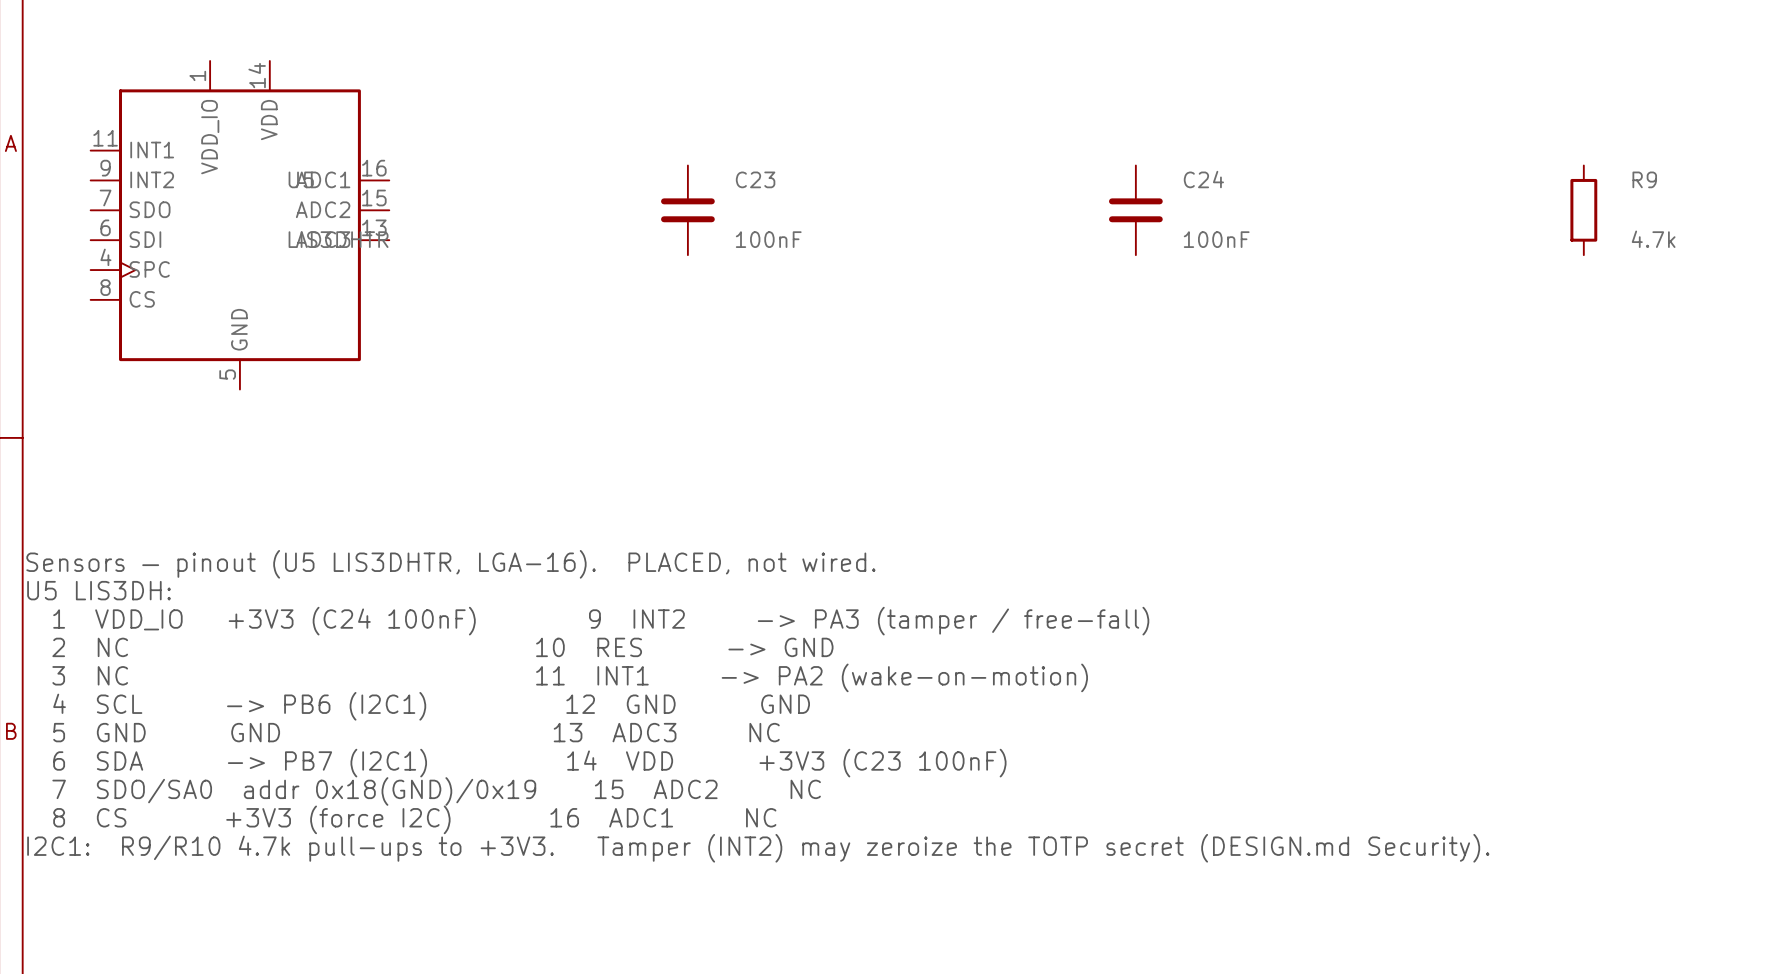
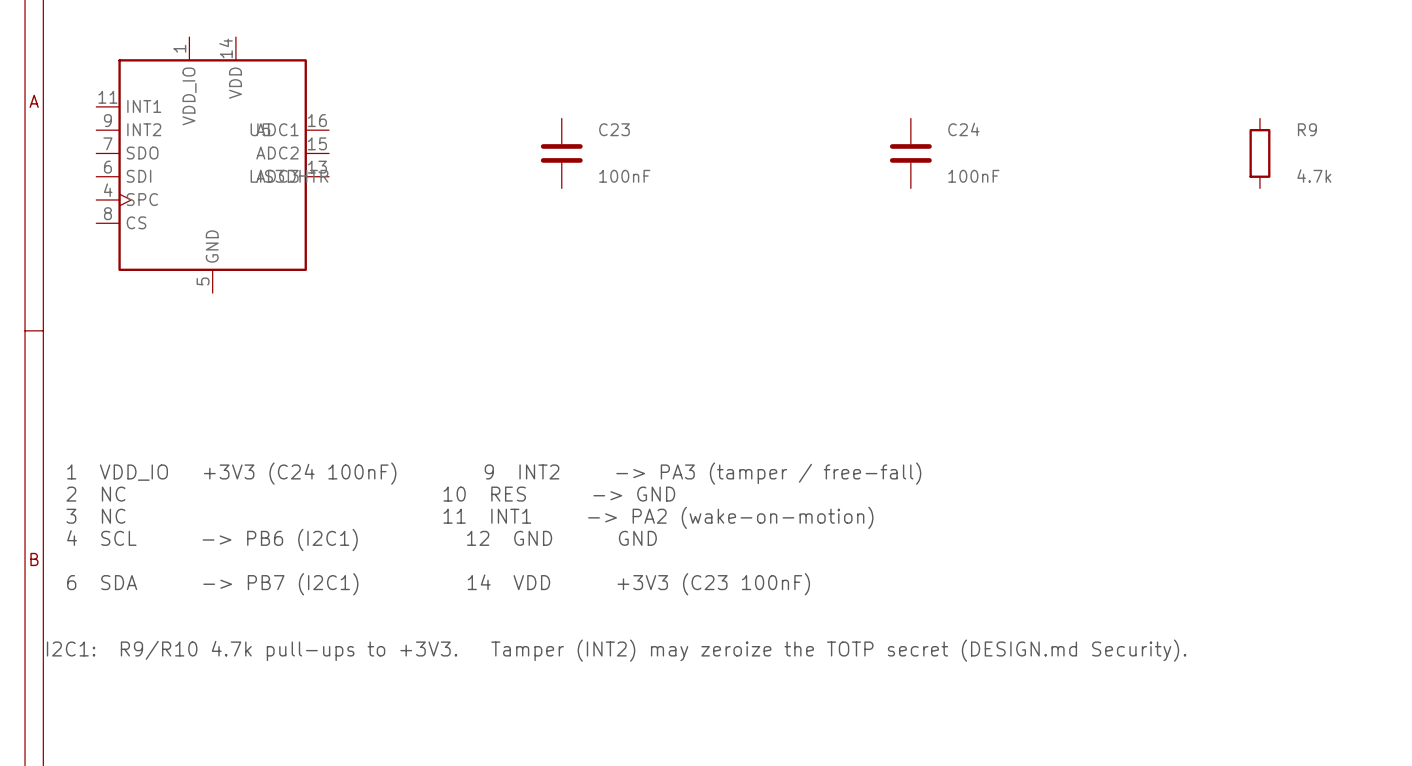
text: Sensors — pinout (U5 LIS3DHTR, LGA-16). PLACED, not wired. (450, 564) -> none
text: U5 LIS3DH: (99, 590) -> none
text: 5 GND GND 13 ADC3 NC (416, 732) -> none
text: 7 SDO/SA0 addr 0x18(GND)/0x19 15 ADC2 NC (436, 791) -> none
text: 8 CS +3V3 (force I2C) 16 ADC1 NC (414, 819) -> none

